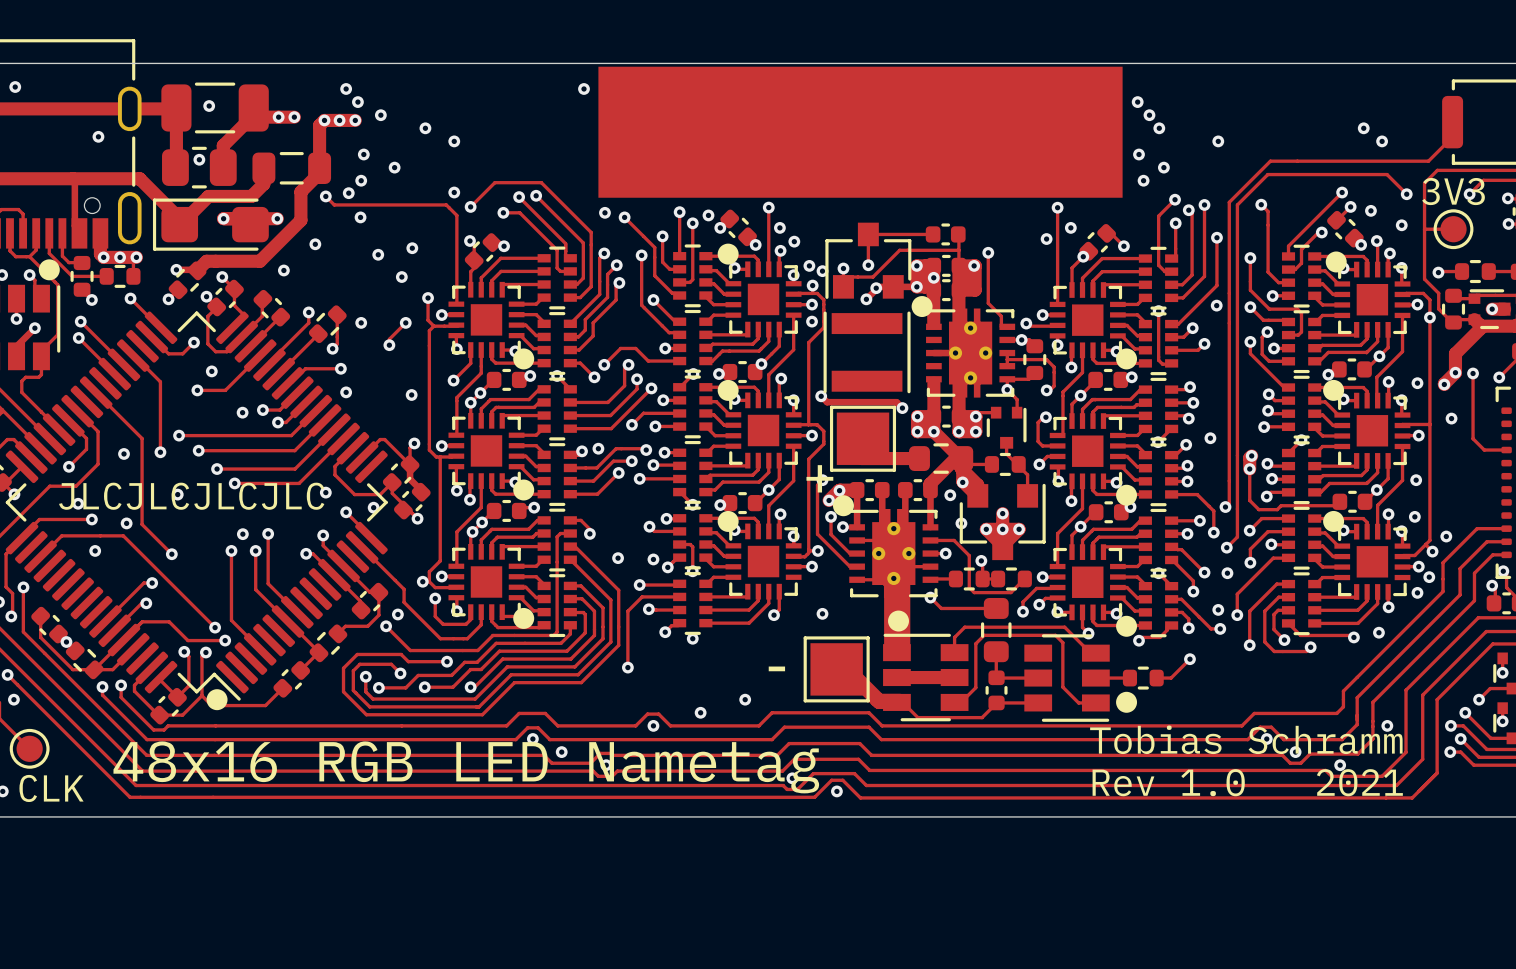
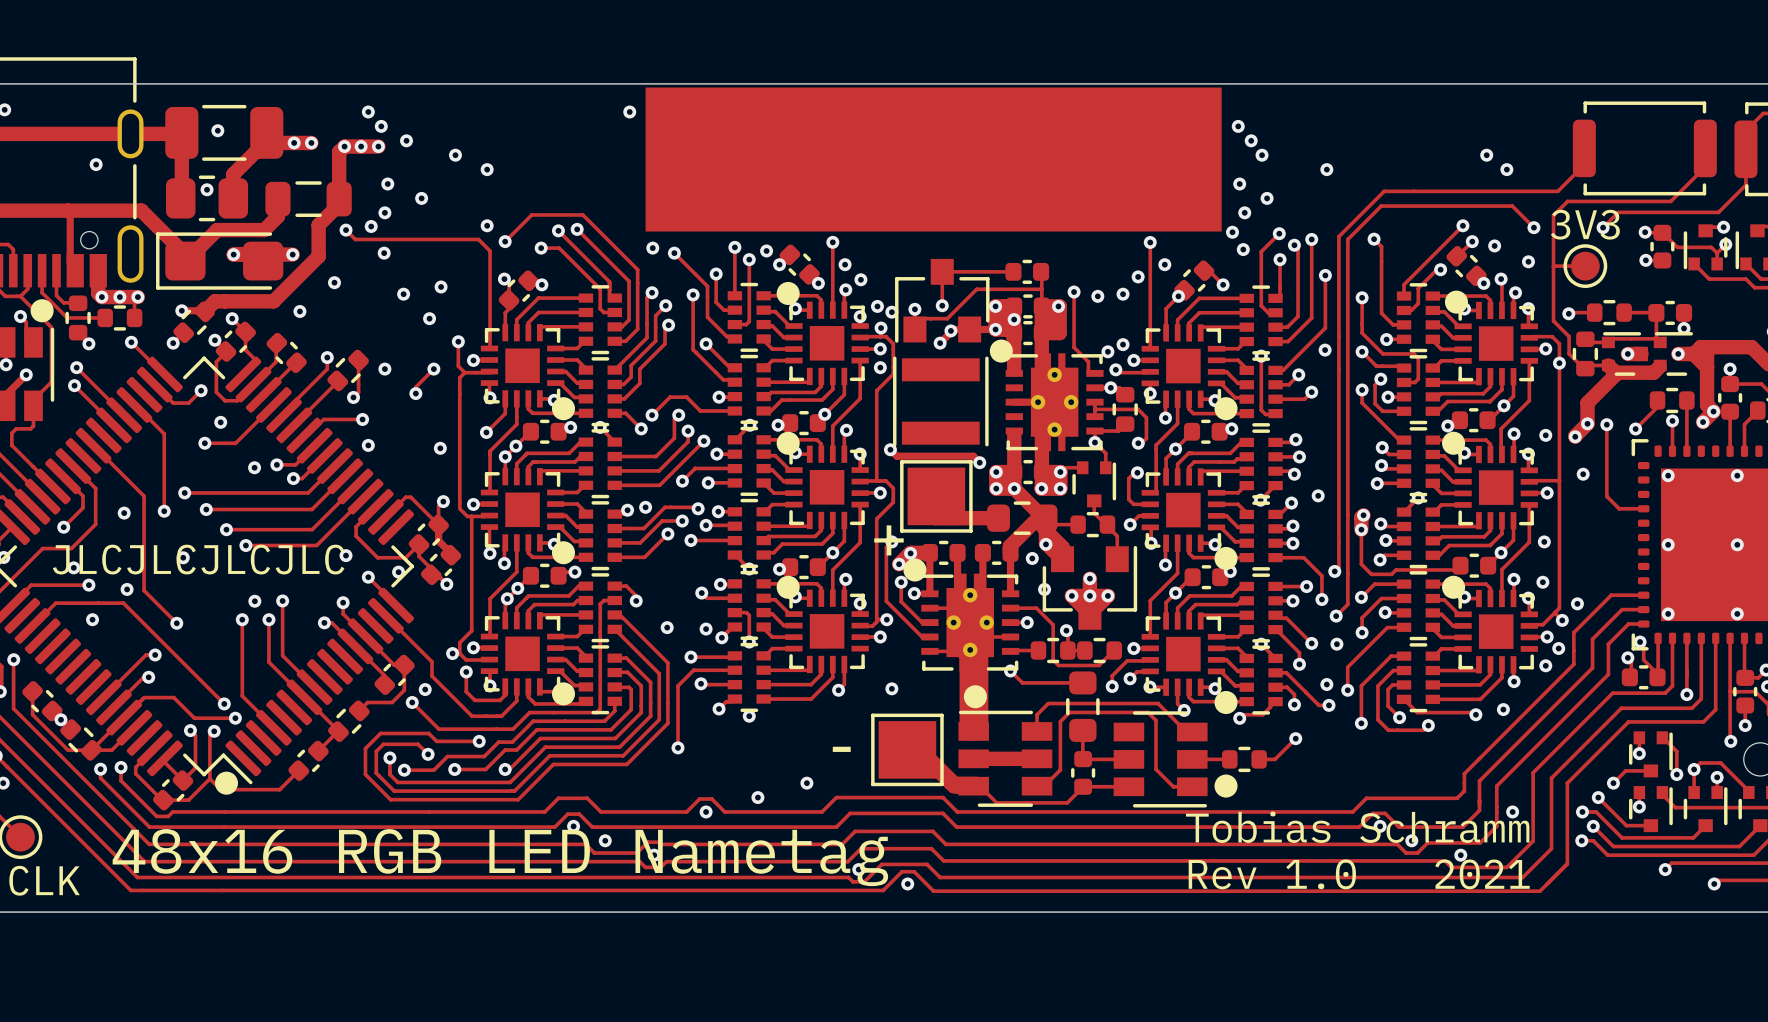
via: none -> (1232, 232)
via: none -> (1243, 249)
via: none -> (1123, 294)
via: none -> (1097, 296)
via: none -> (1123, 344)
via: none -> (1107, 351)

